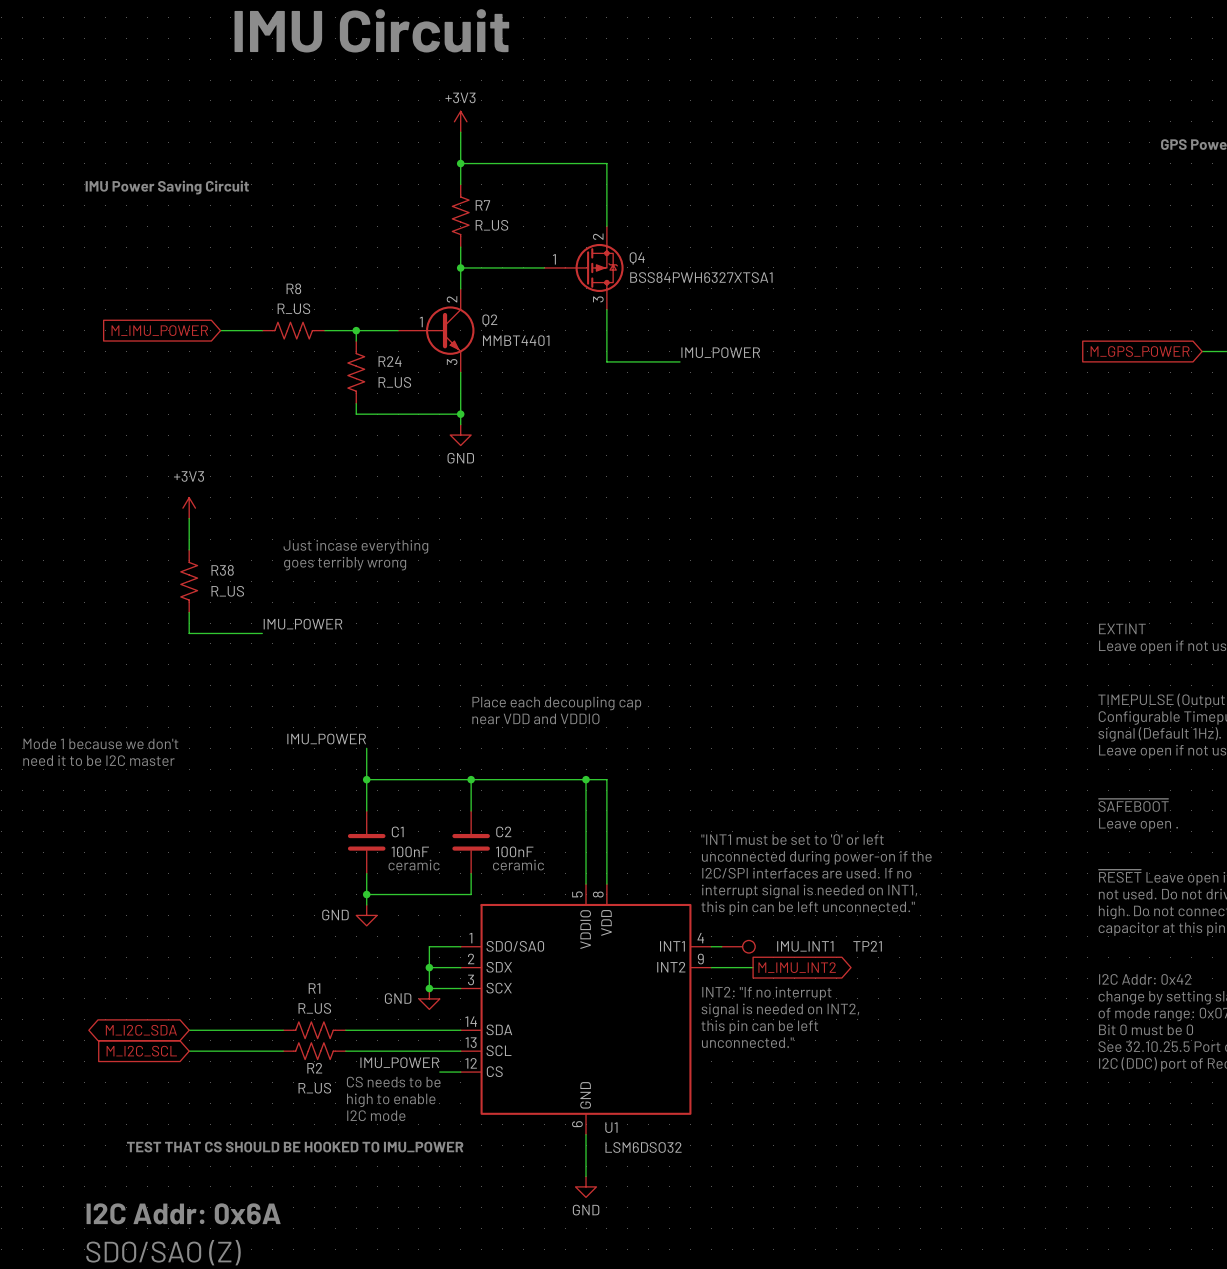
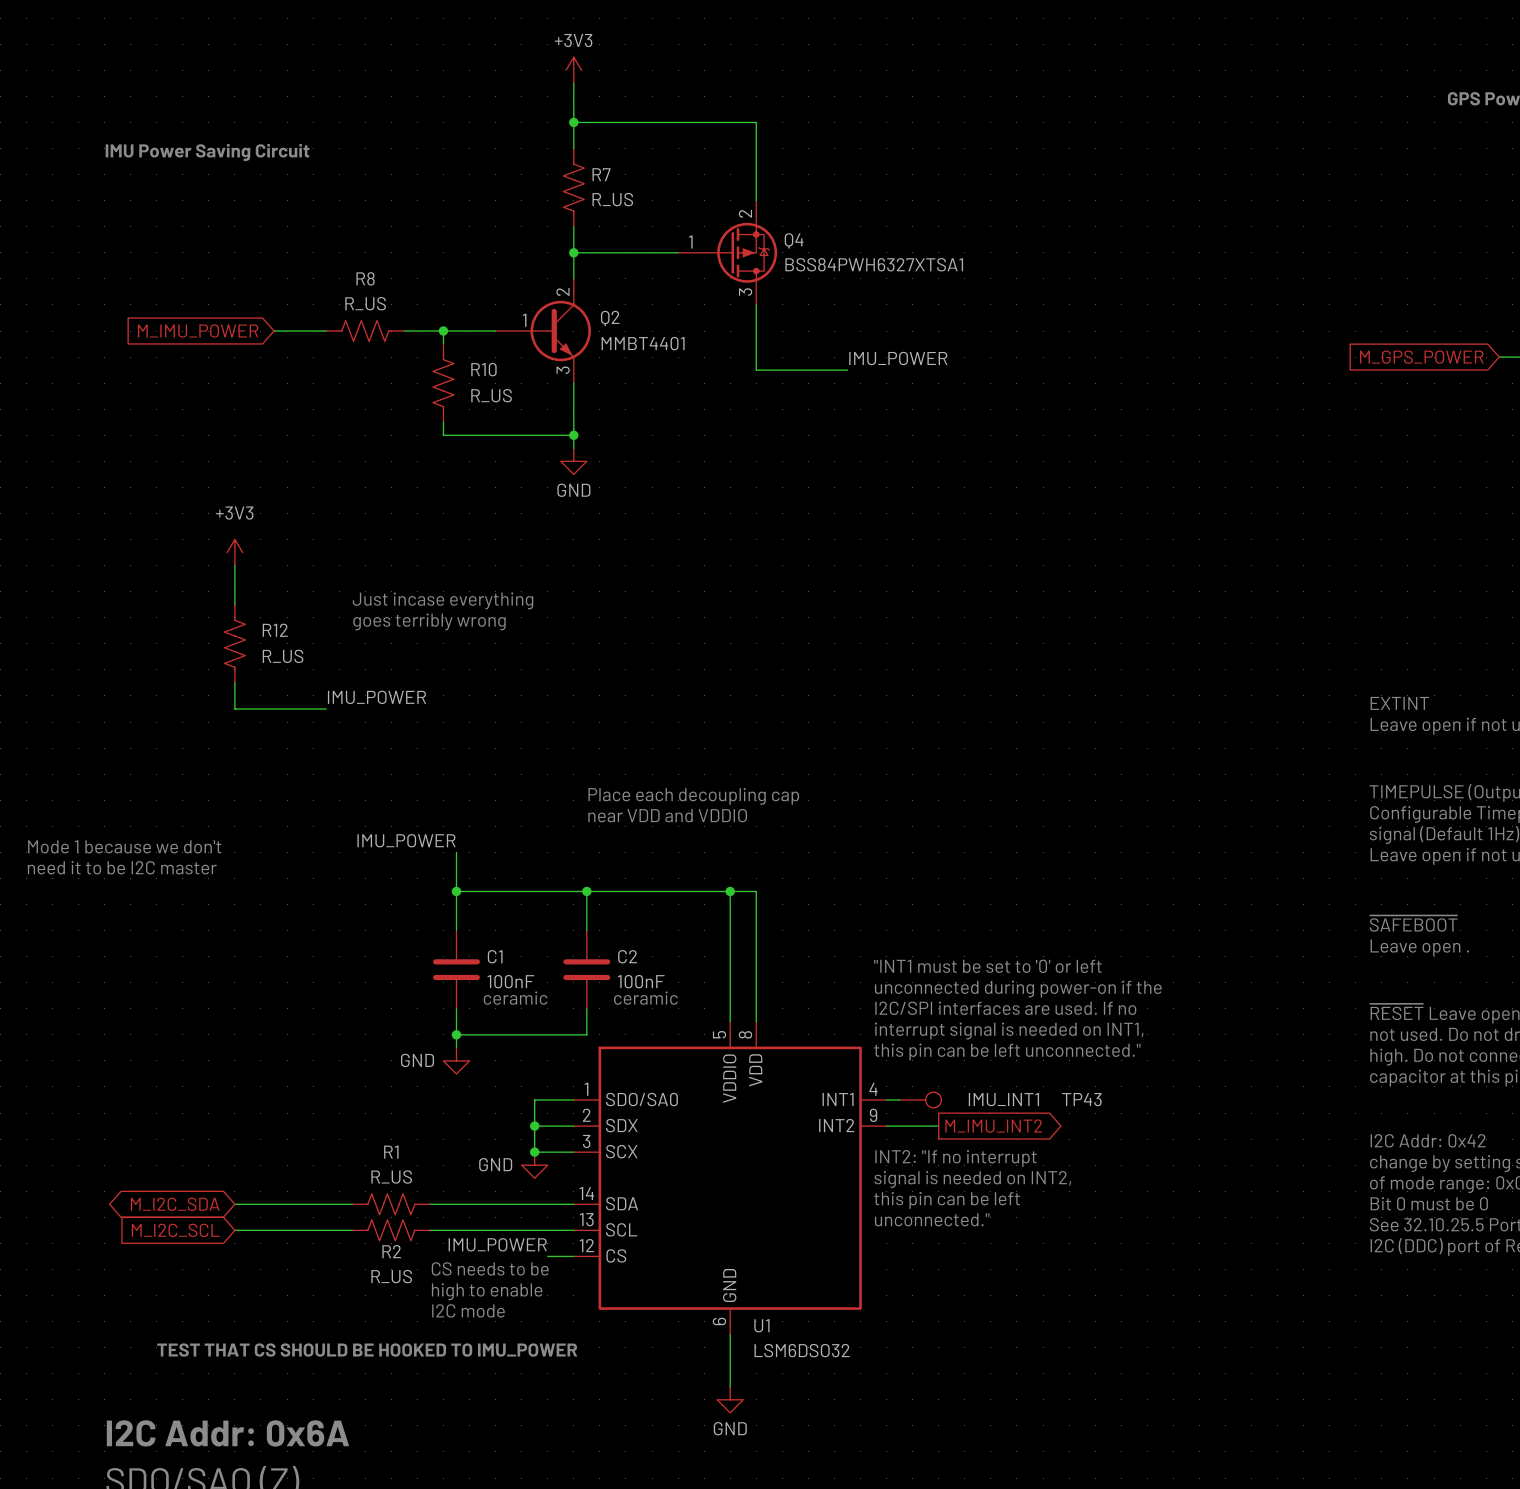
R24 name: R24 (390, 361) -> R10 (483, 369)
R38 name: R38 (222, 570) -> R12 (275, 630)
TP21 name: TP21 (867, 946) -> TP43 (1081, 1099)

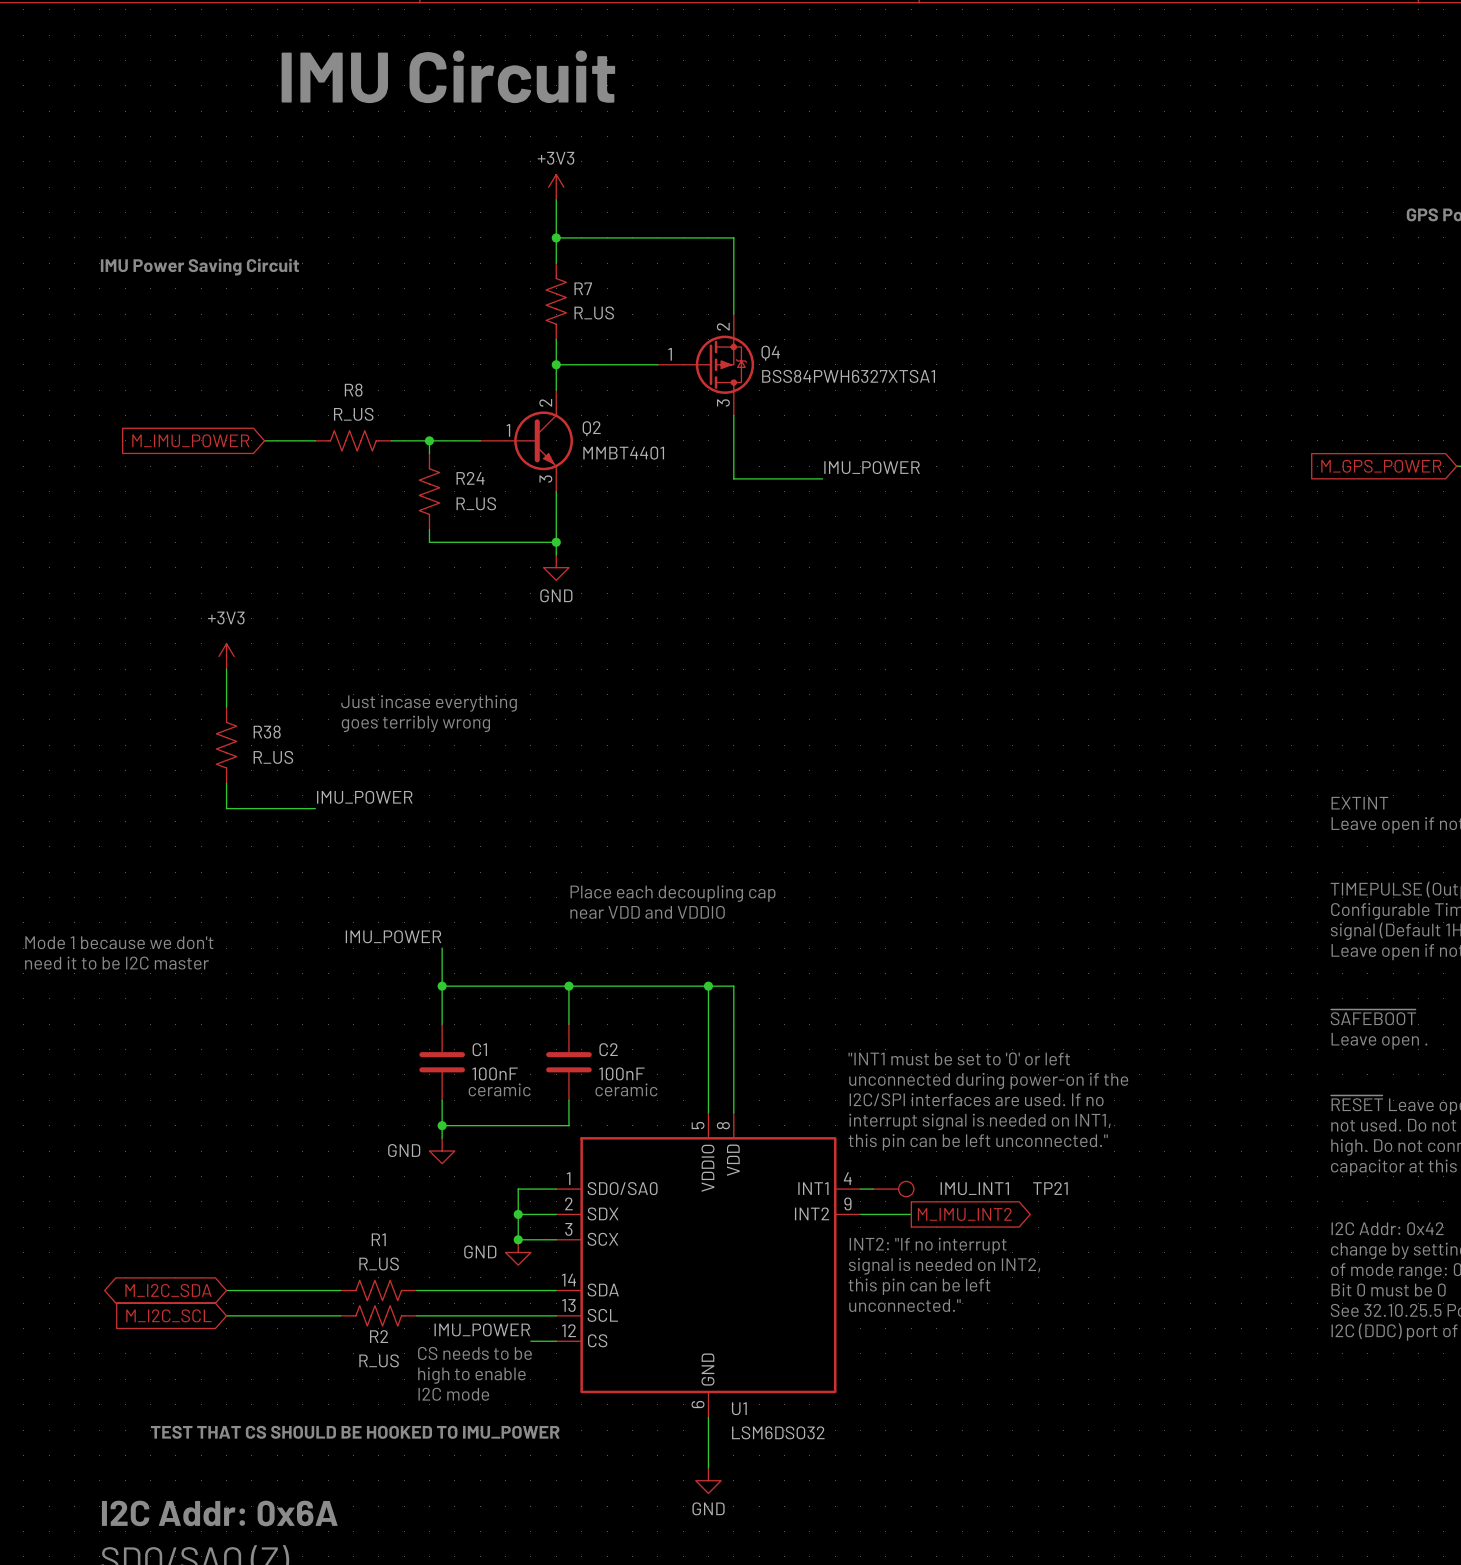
R10 name: R10 (483, 369) -> R24 (470, 478)
R12 name: R12 (275, 630) -> R38 (267, 732)
TP43 name: TP43 (1081, 1099) -> TP21 (1050, 1188)

